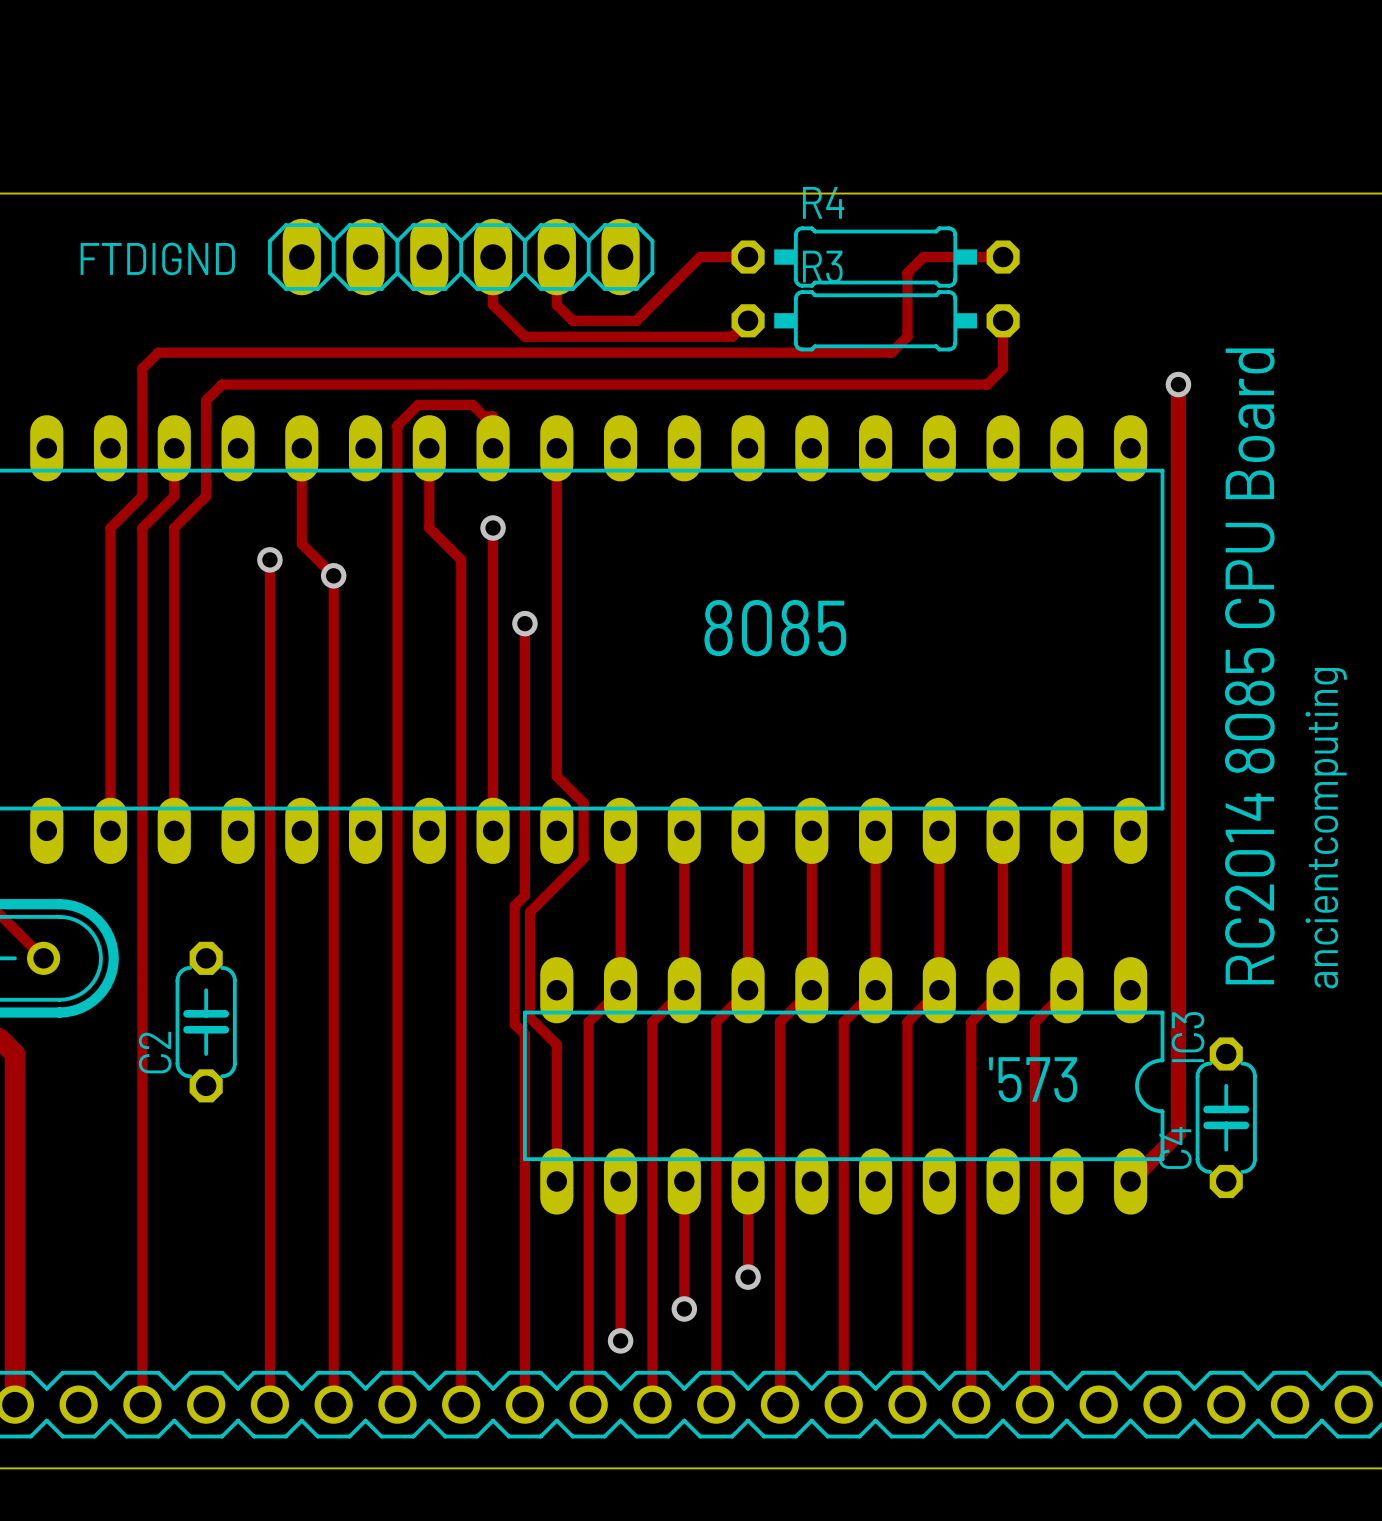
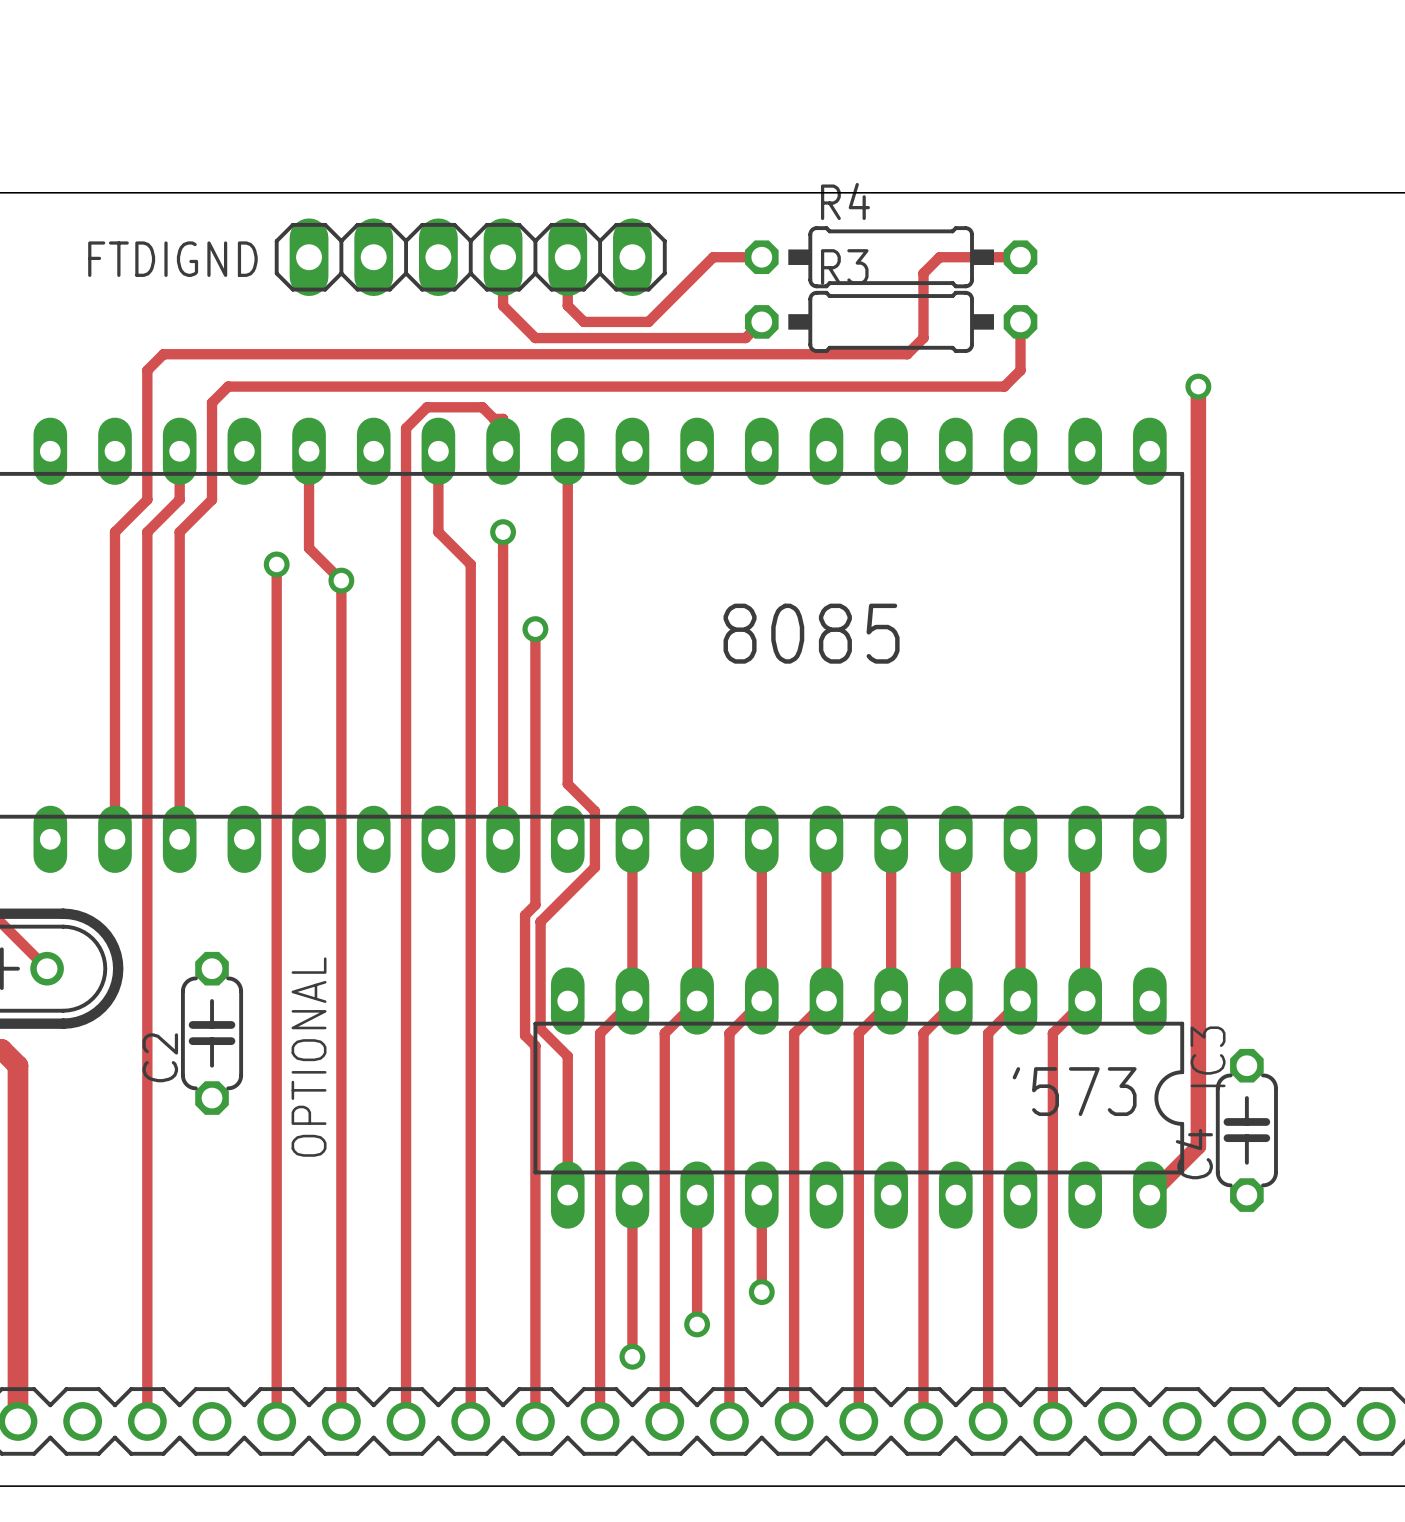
text: RC2014 8085 CPU Board (1249, 666) -> none
text: ancientcomputing (1326, 828) -> none
text: none -> OPTIONAL (309, 1057)

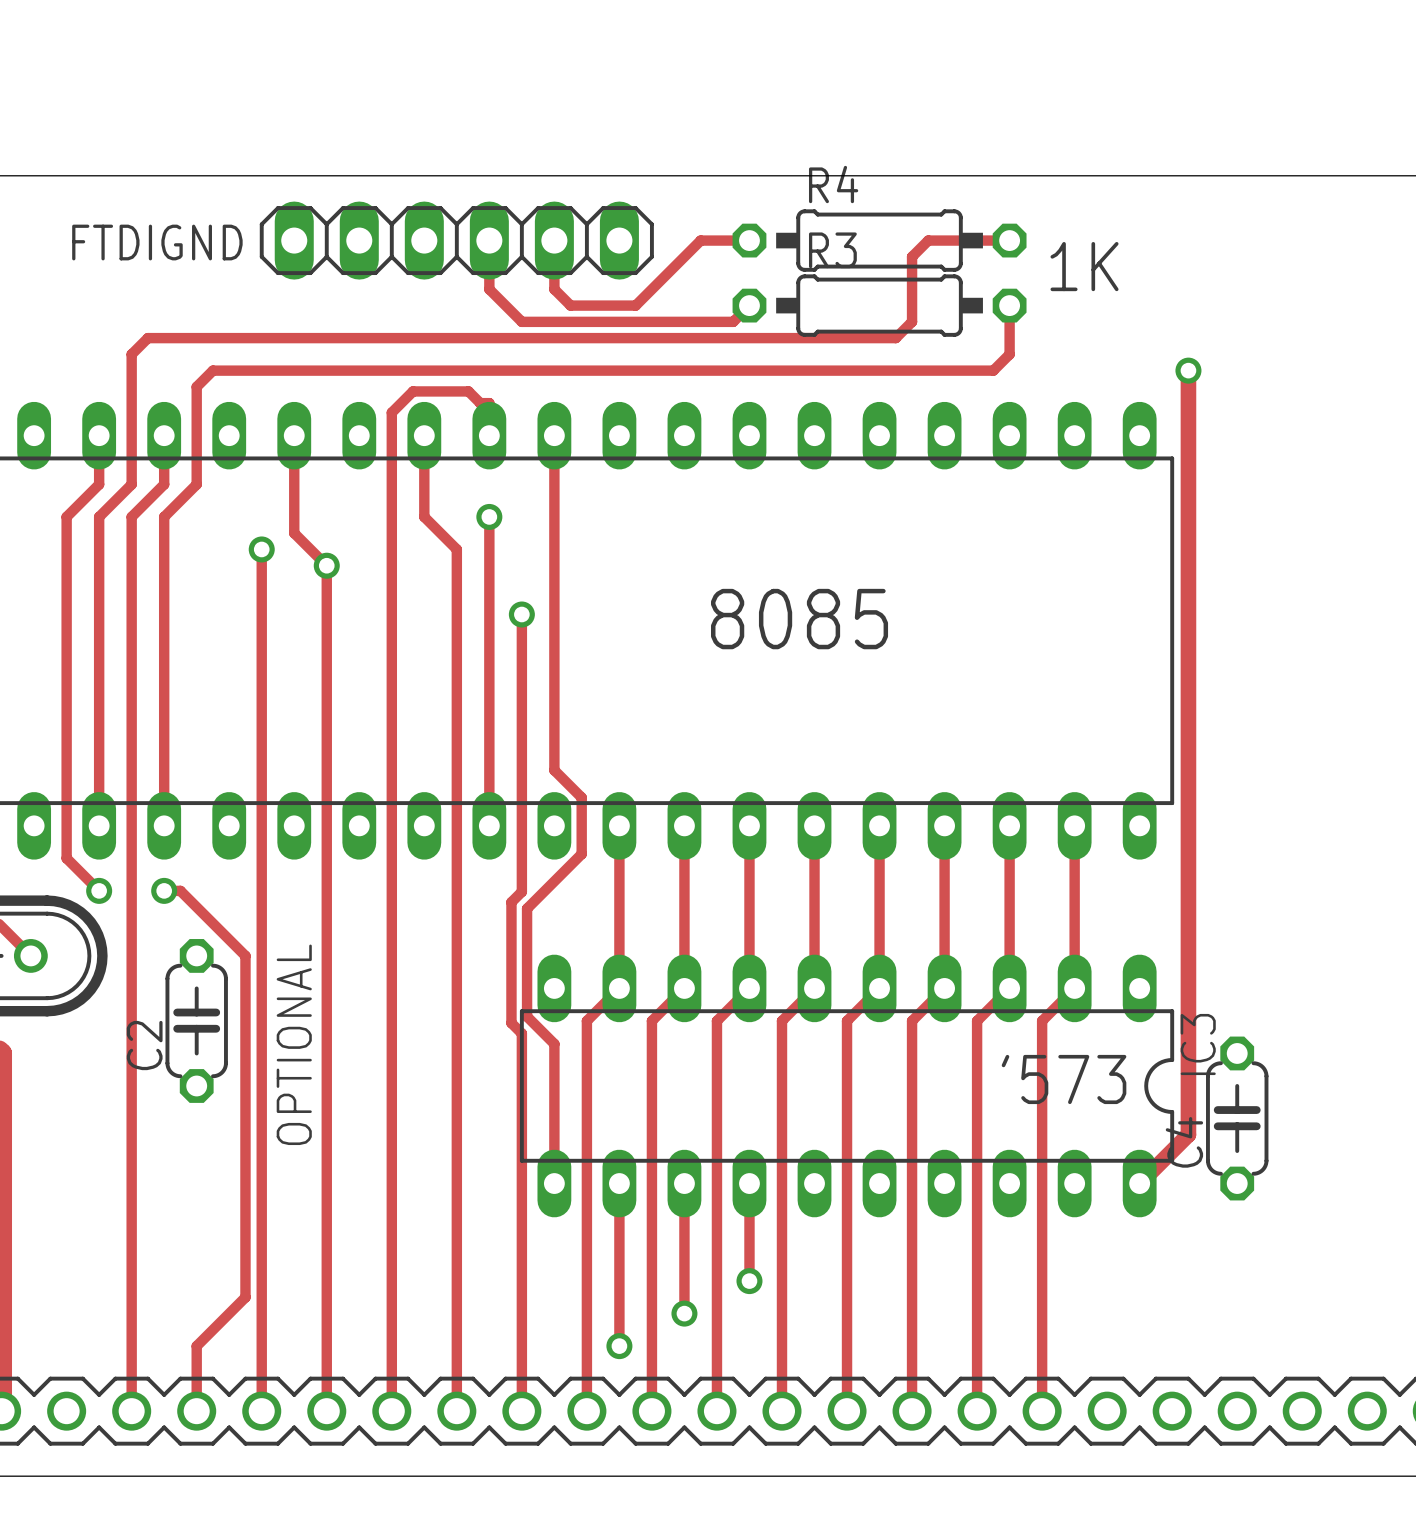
text: none -> 1K (1084, 266)
track: none -> (99, 435) (99, 484) (66, 516) (66, 858) (99, 890)
via: none -> (99, 890)
track: none -> (164, 890) (180, 890) (245, 955) (245, 1297) (196, 1346) (196, 1411)
via: none -> (164, 890)

